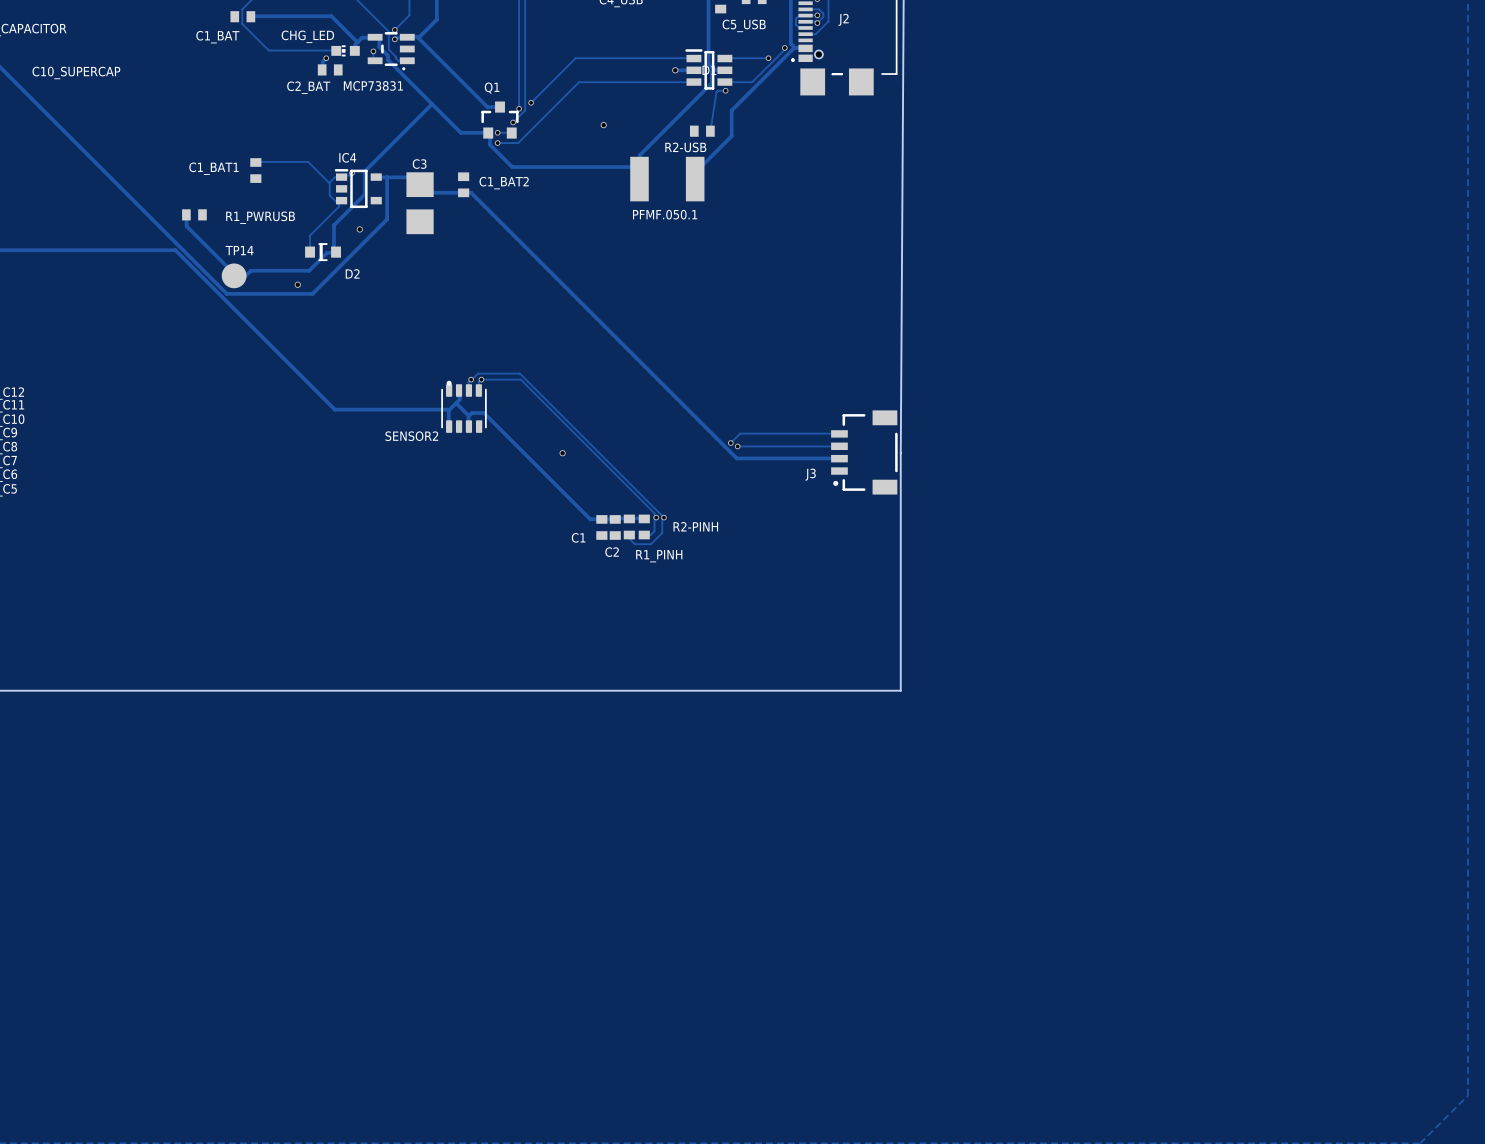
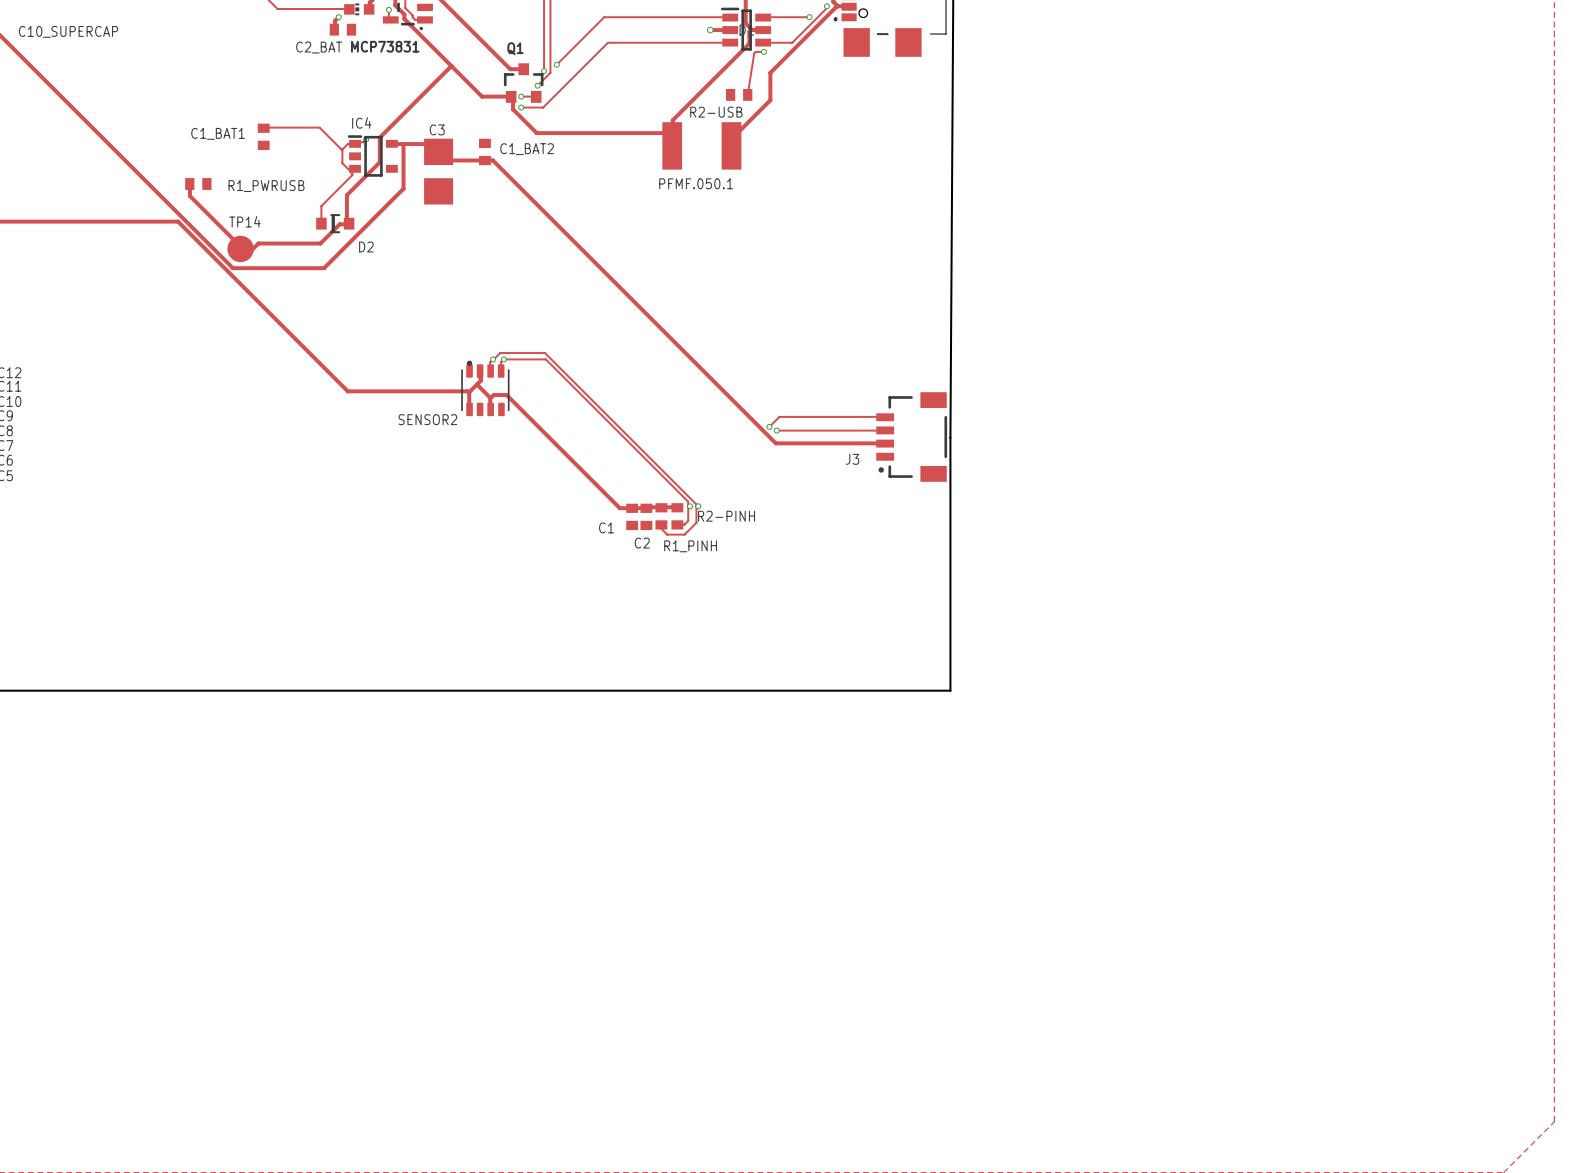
via: (603, 125) -> none
via: (359, 229) -> none
via: (297, 284) -> none
via: (562, 453) -> none

